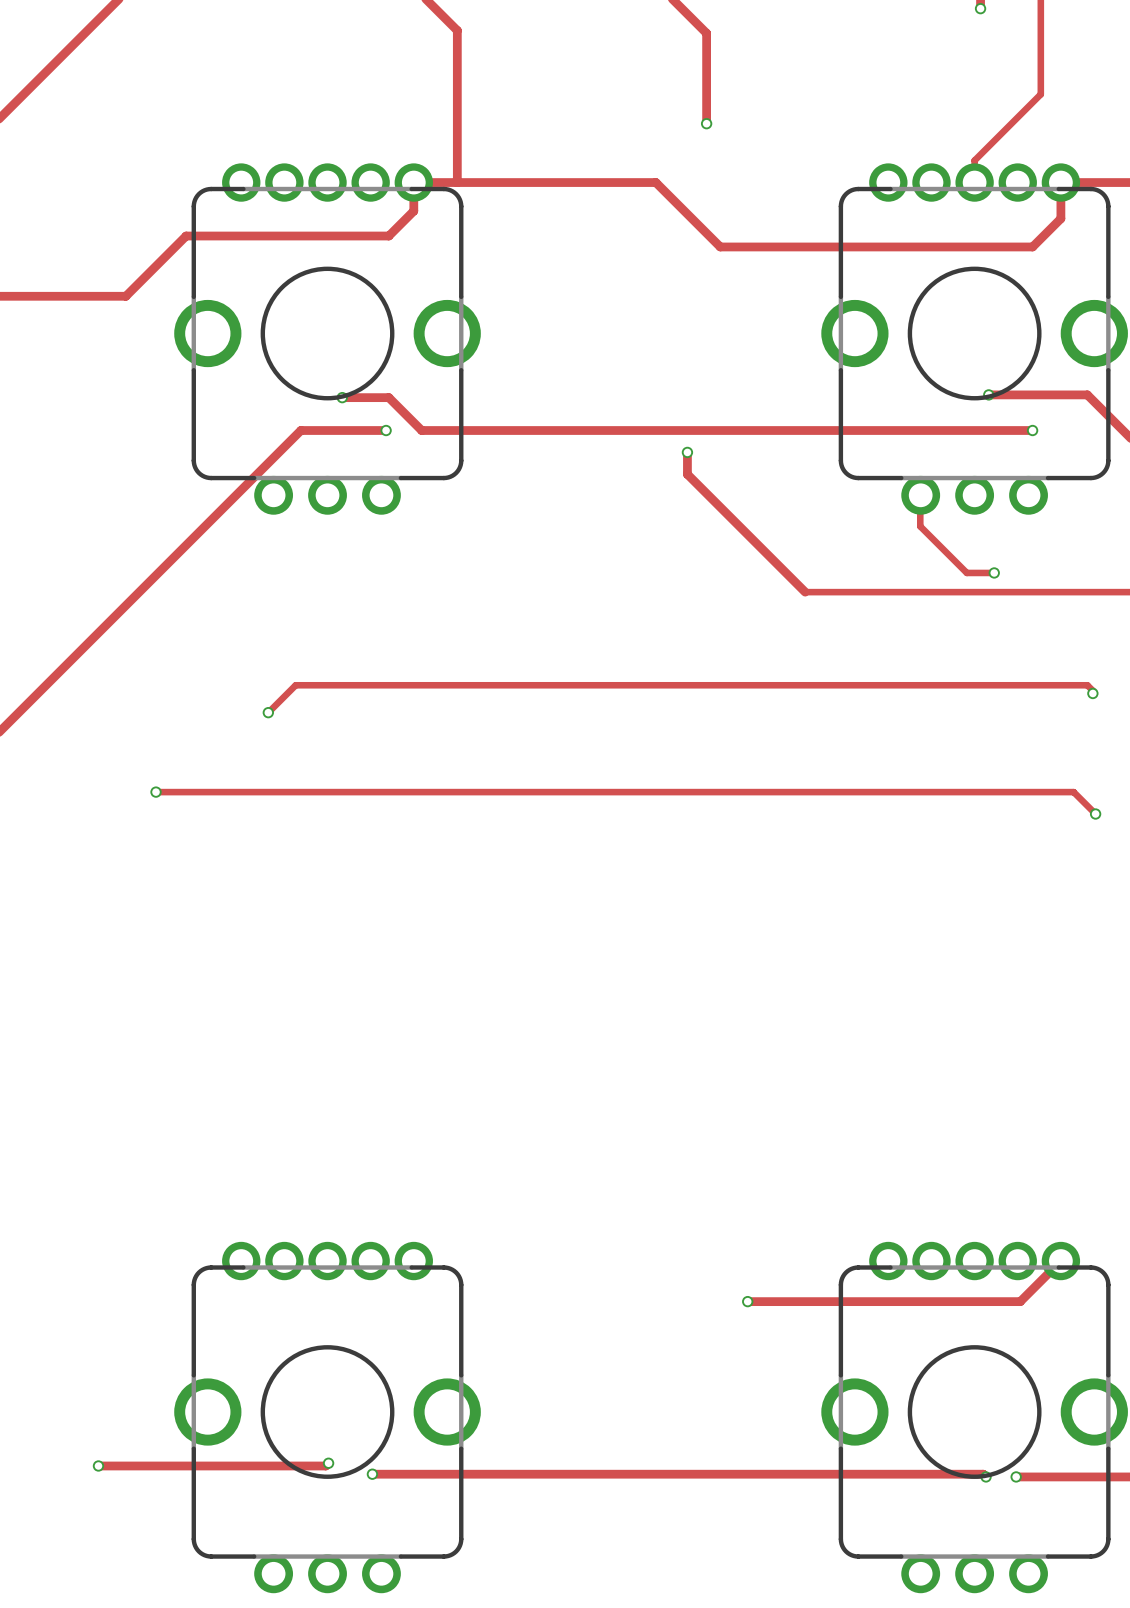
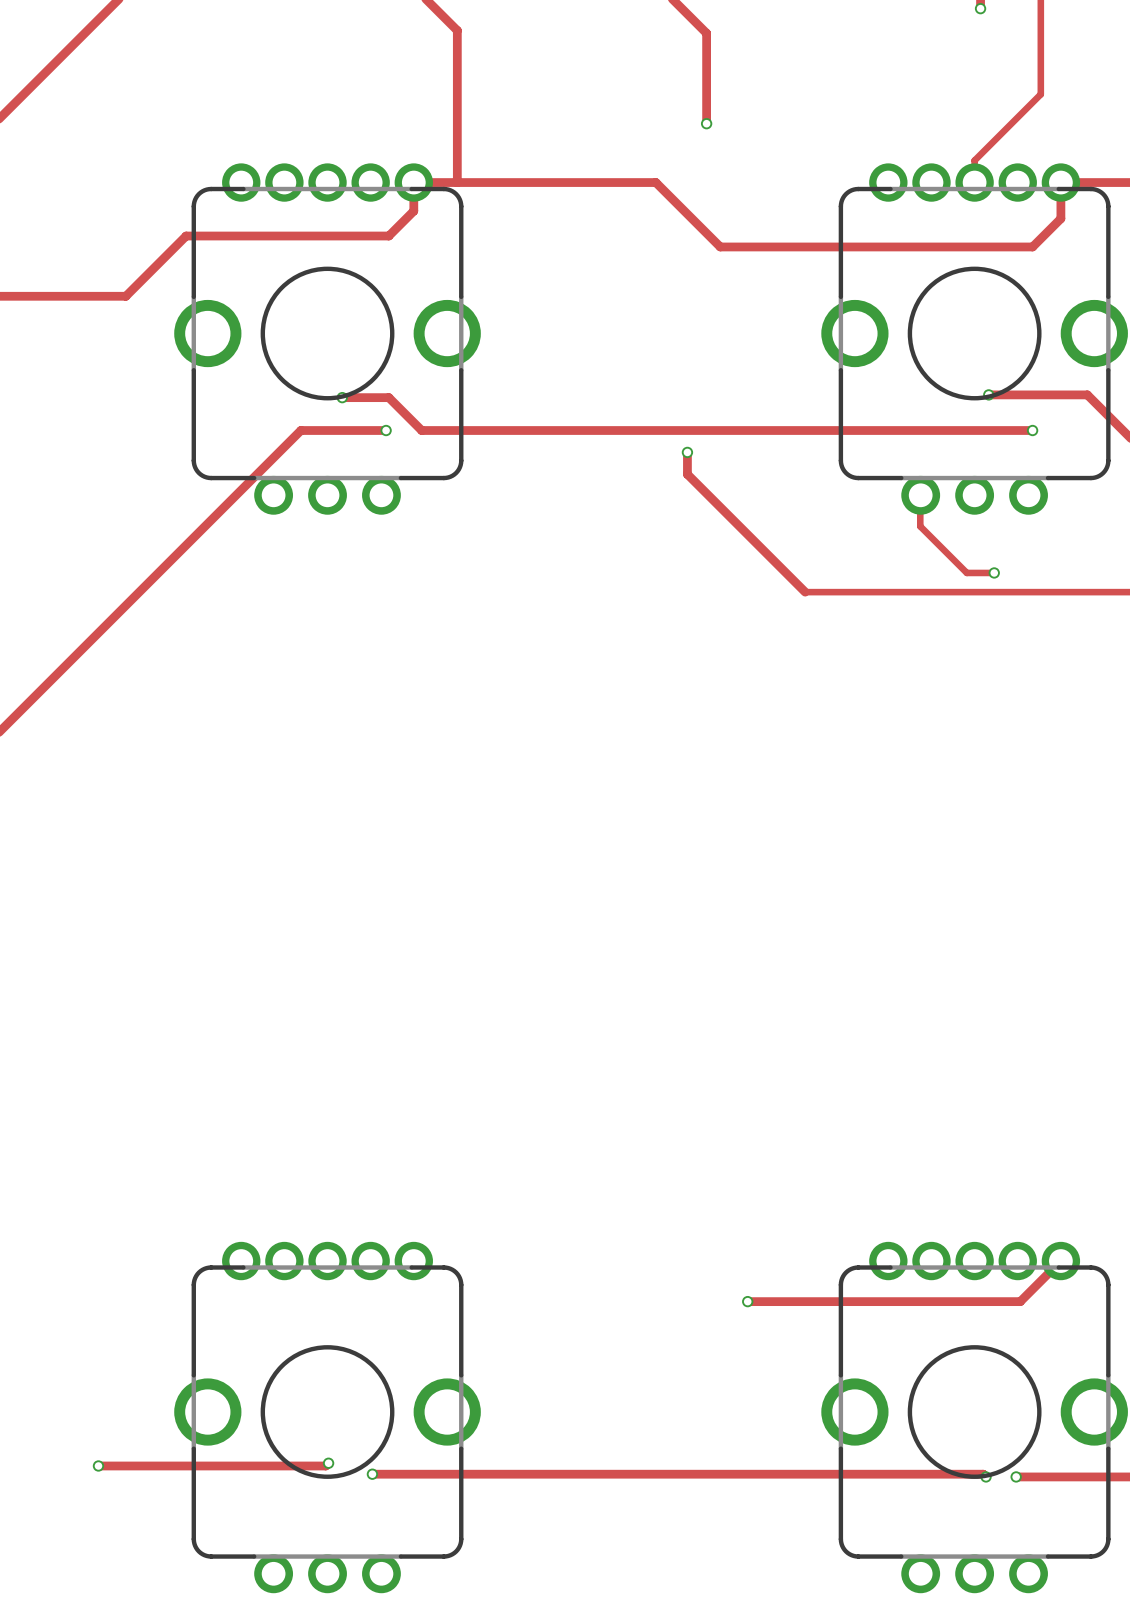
track: (1092, 693) (1092, 690) (1087, 685) (295, 685) (268, 712) -> none
via: (1092, 693) -> none
via: (268, 712) -> none
track: (156, 792) (1073, 792) (1095, 814) -> none
via: (156, 792) -> none
via: (1095, 814) -> none

